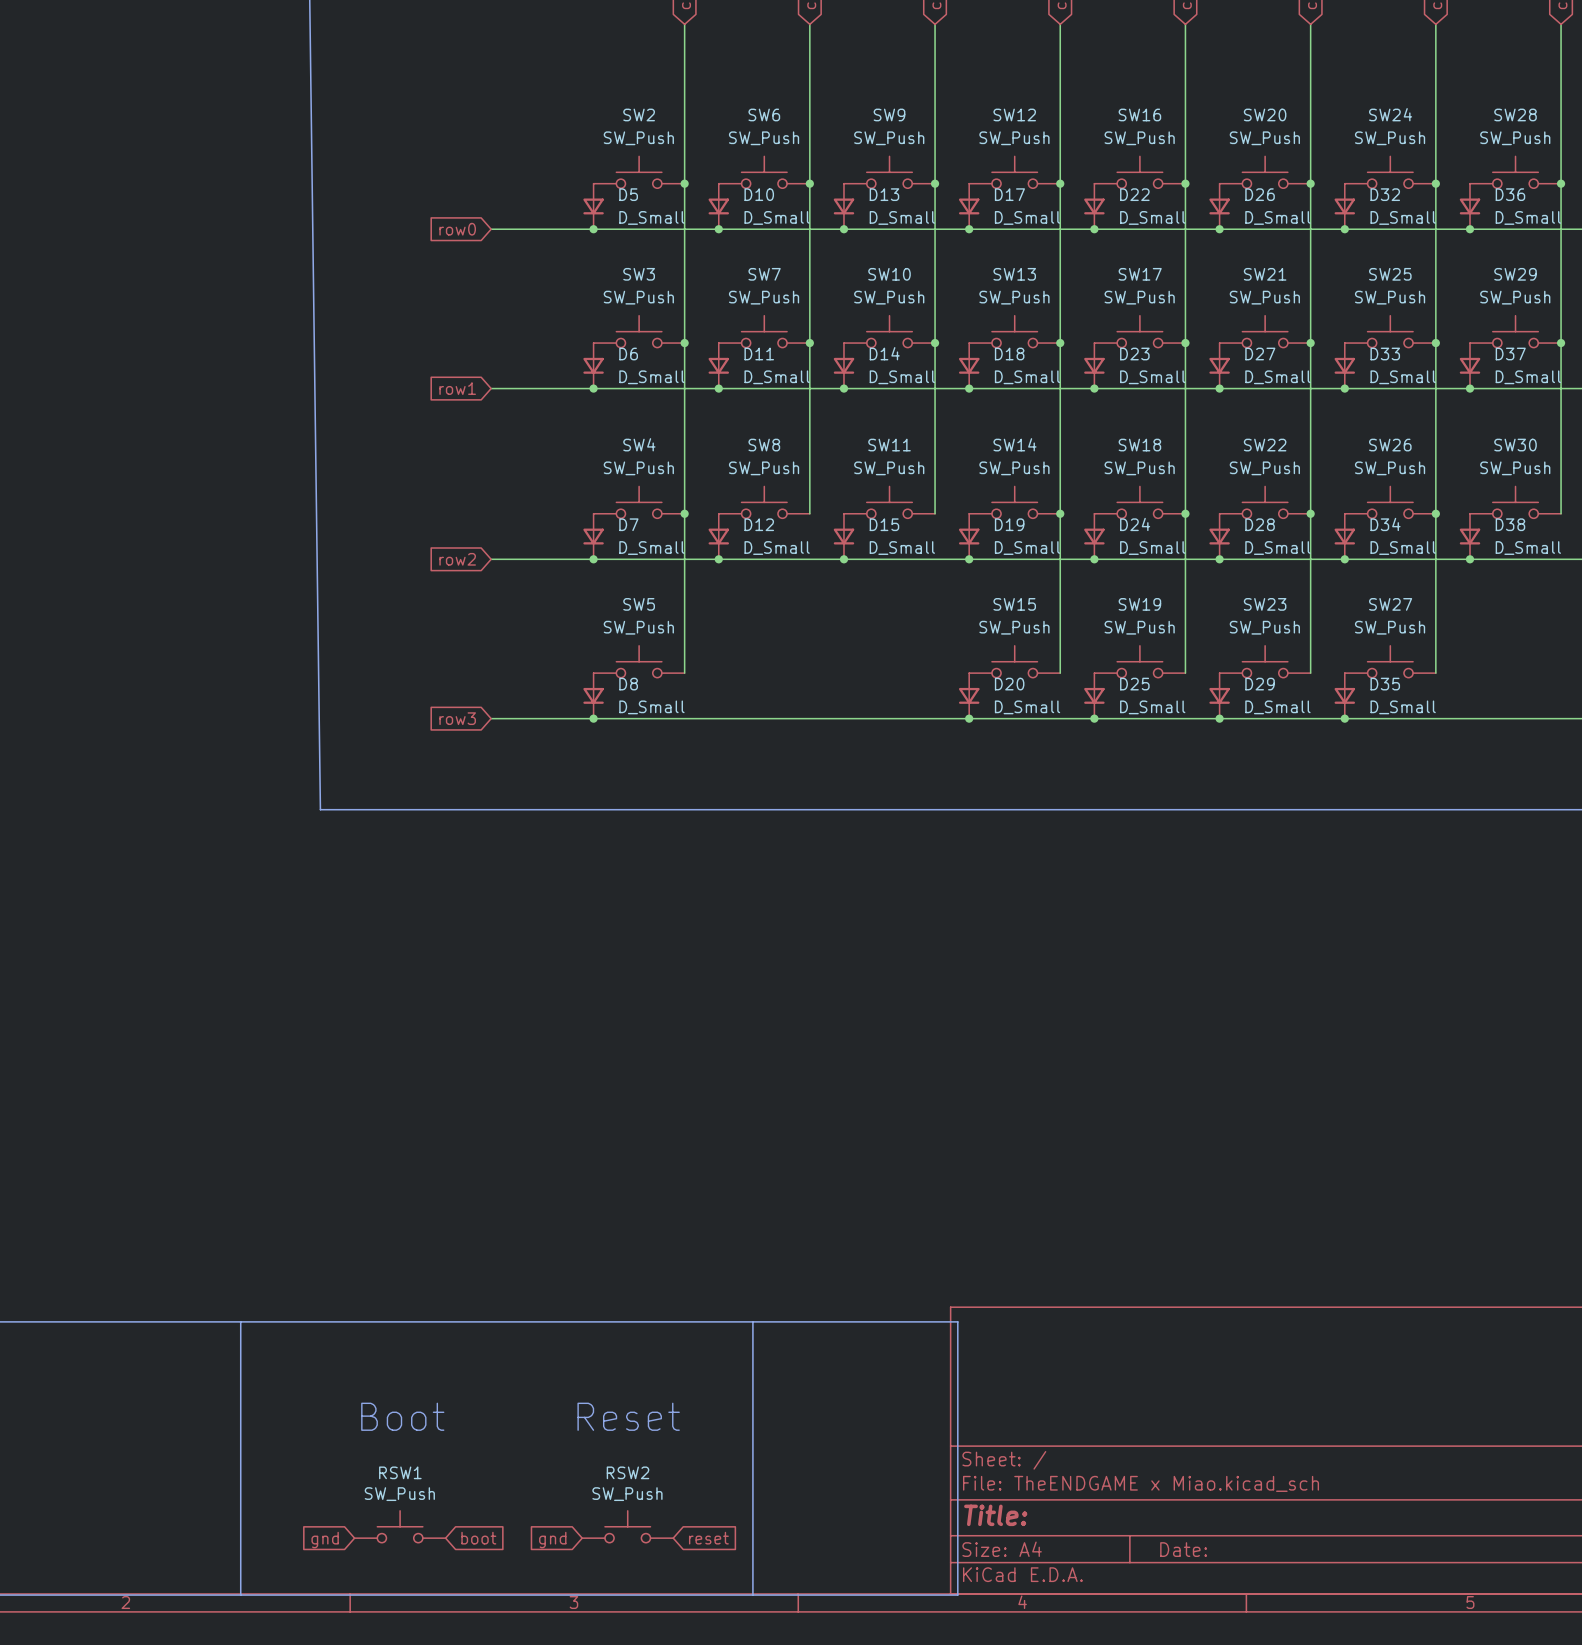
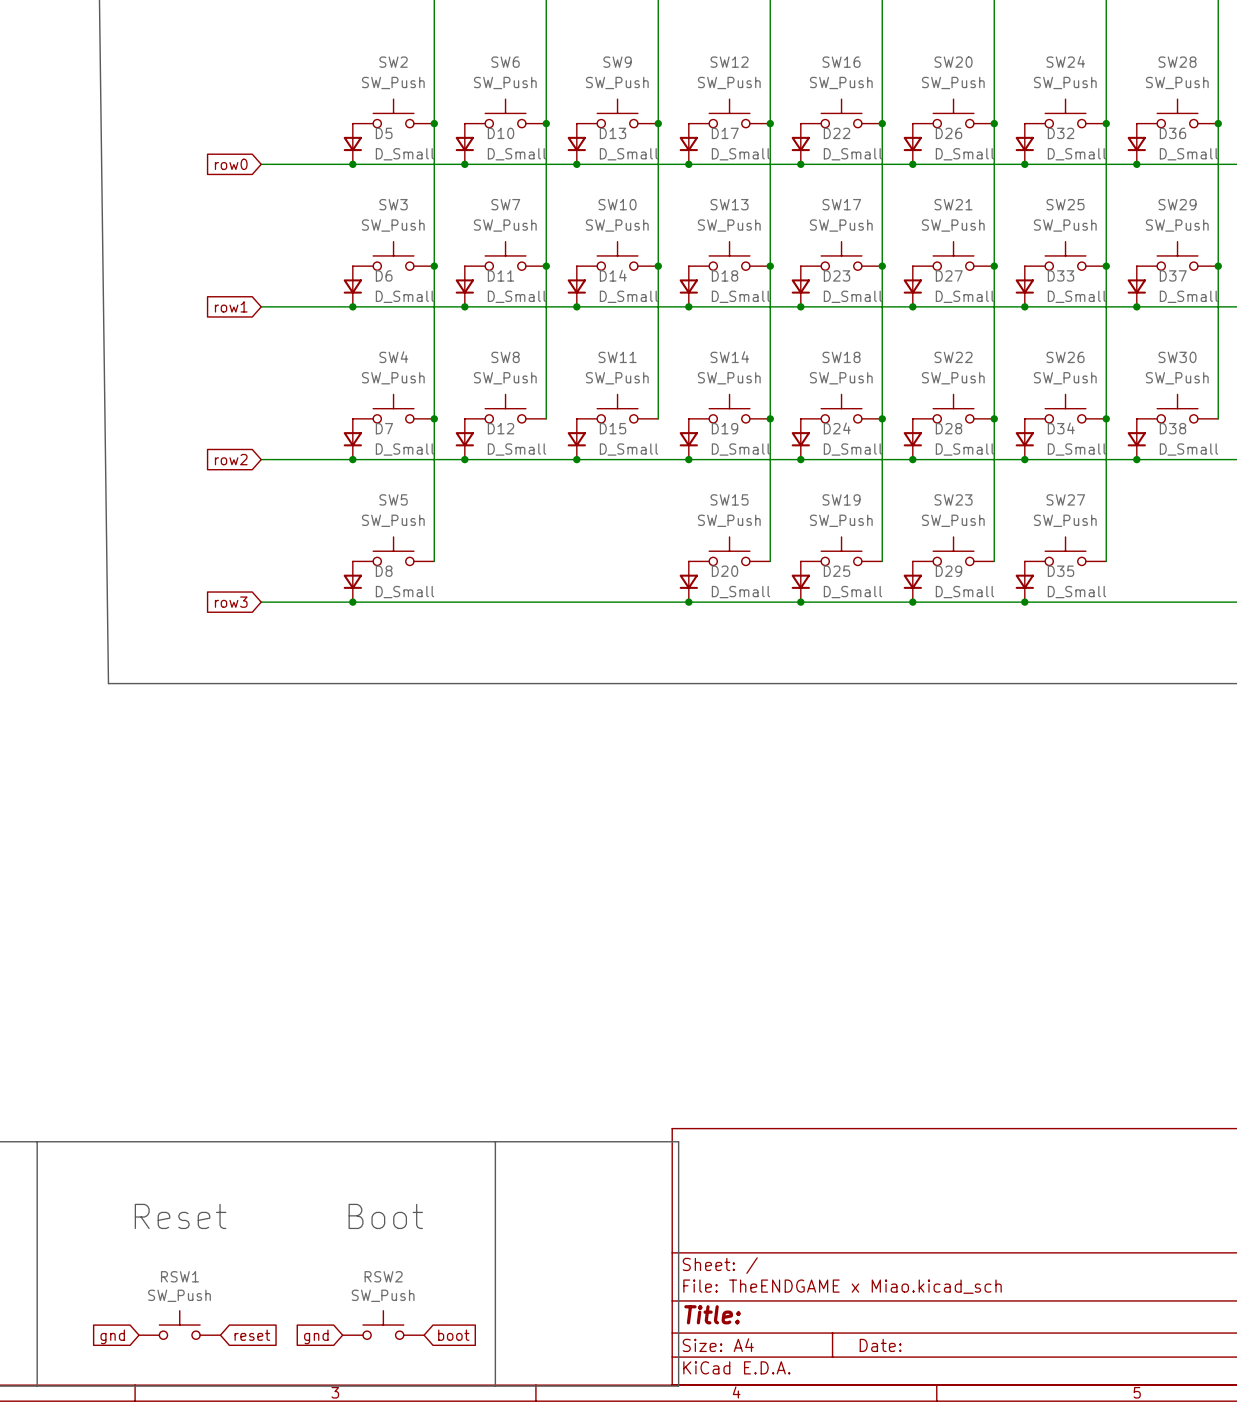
text: none -> Reset (180, 1216)
text: none -> Boot (385, 1216)
text: Boot (402, 1416) -> none
text: Reset (628, 1416) -> none
global label: boot (478, 1538) -> reset (252, 1335)
global label: reset (708, 1538) -> boot (453, 1335)

